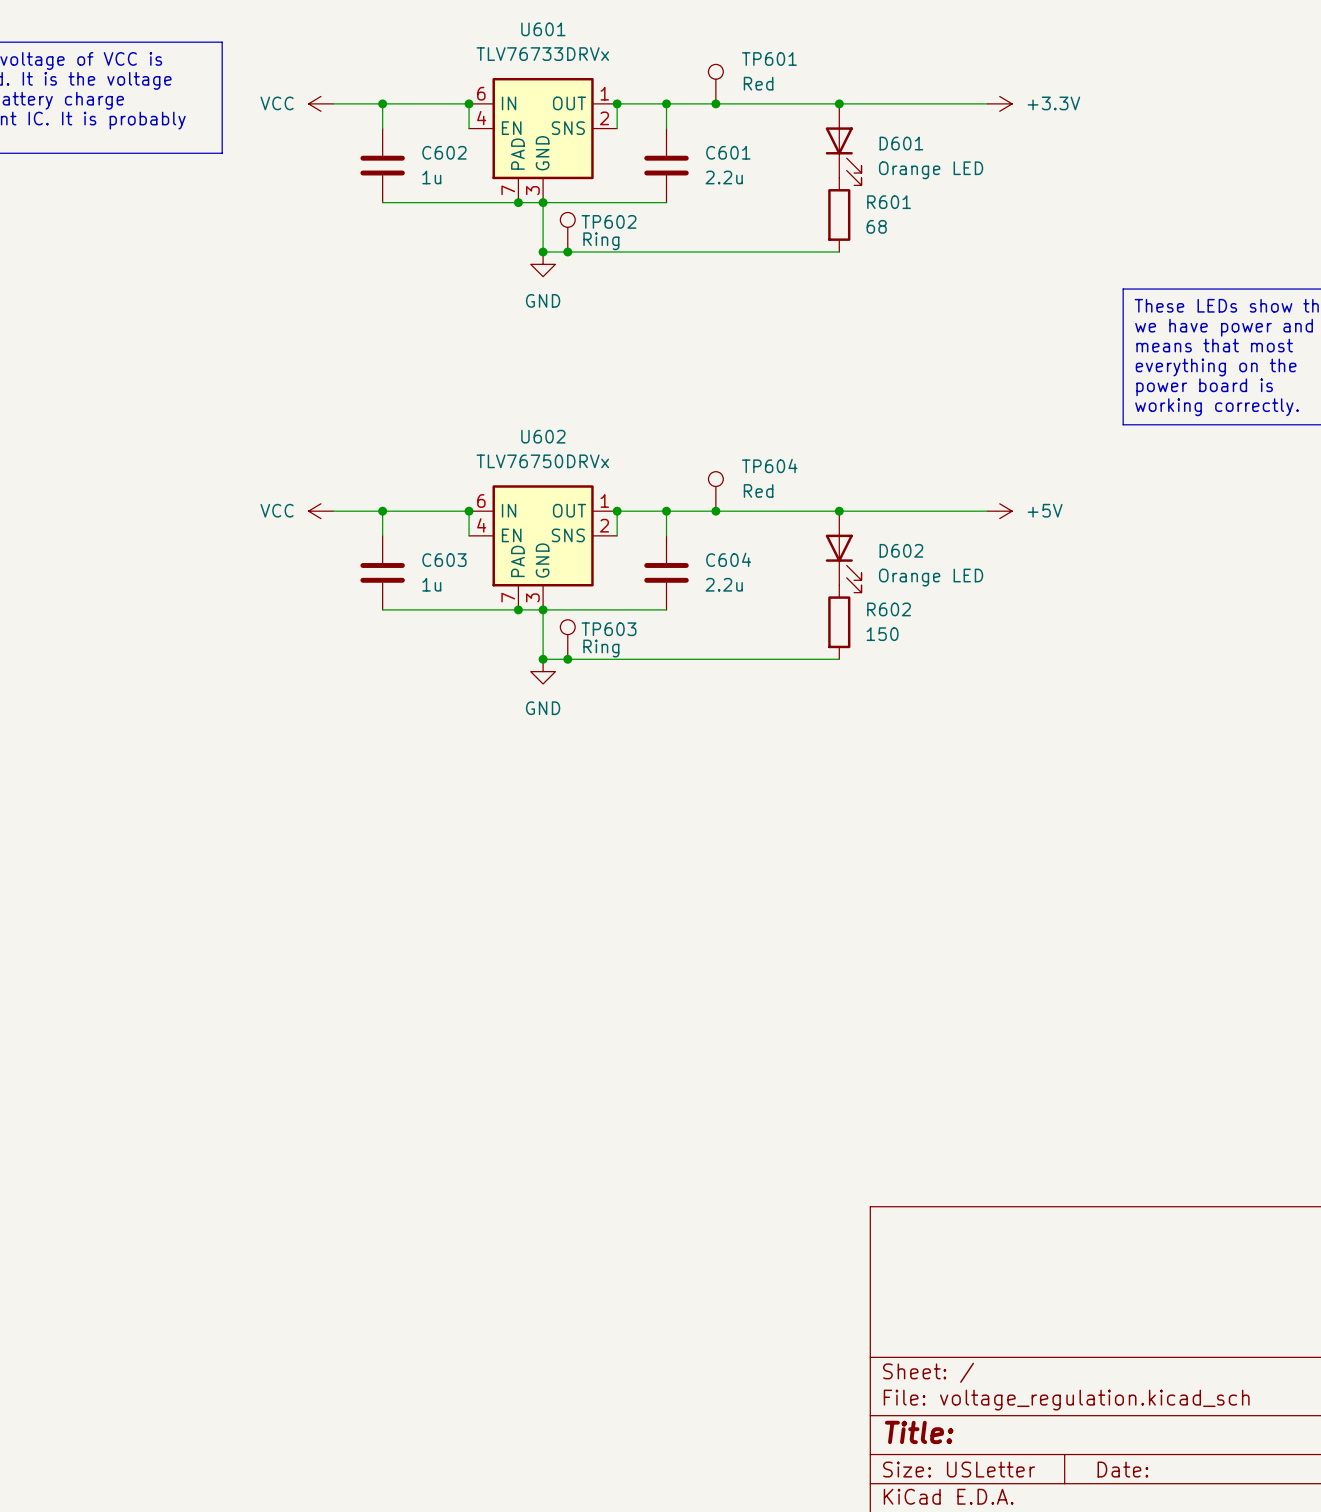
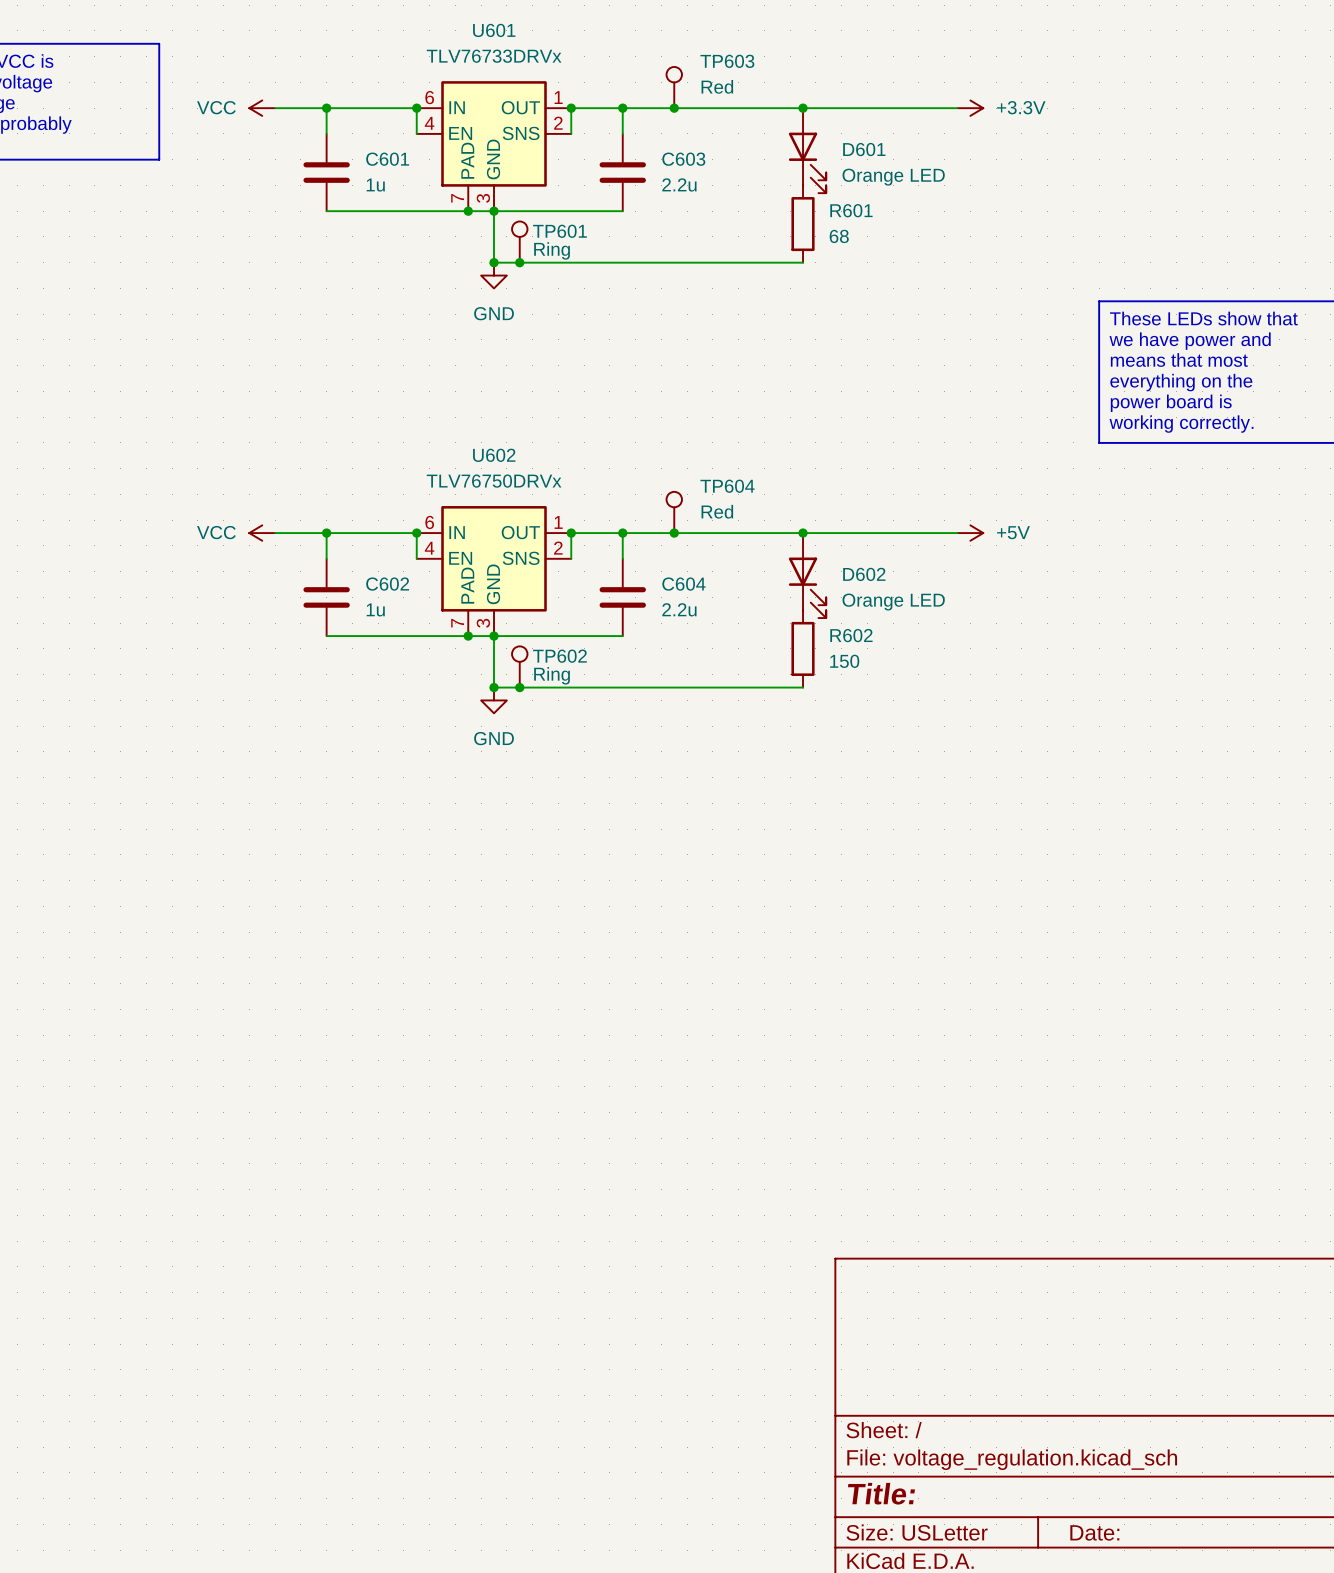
TP601 name: TP601 (769, 59) -> TP603 (727, 61)
C602 name: C602 (444, 152) -> C601 (387, 159)
C601 name: C601 (728, 152) -> C603 (683, 159)
TP602 name: TP602 (609, 221) -> TP601 (559, 231)
C603 name: C603 (444, 560) -> C602 (387, 584)
TP603 name: TP603 (609, 629) -> TP602 (559, 656)

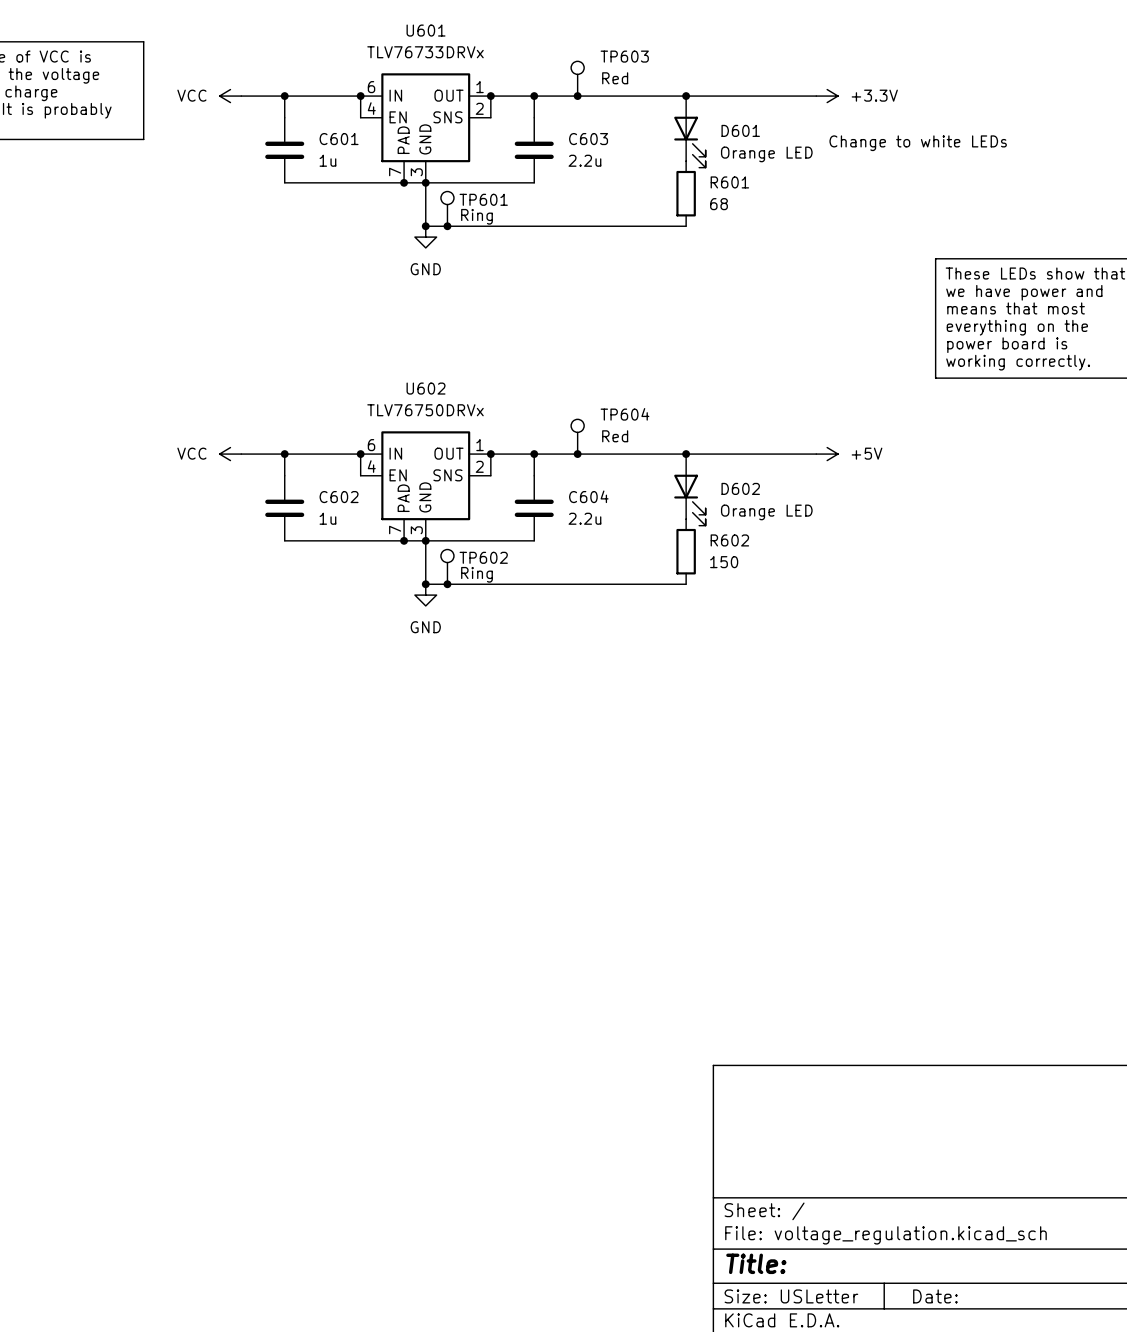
text: none -> Change to white LEDs (918, 143)

